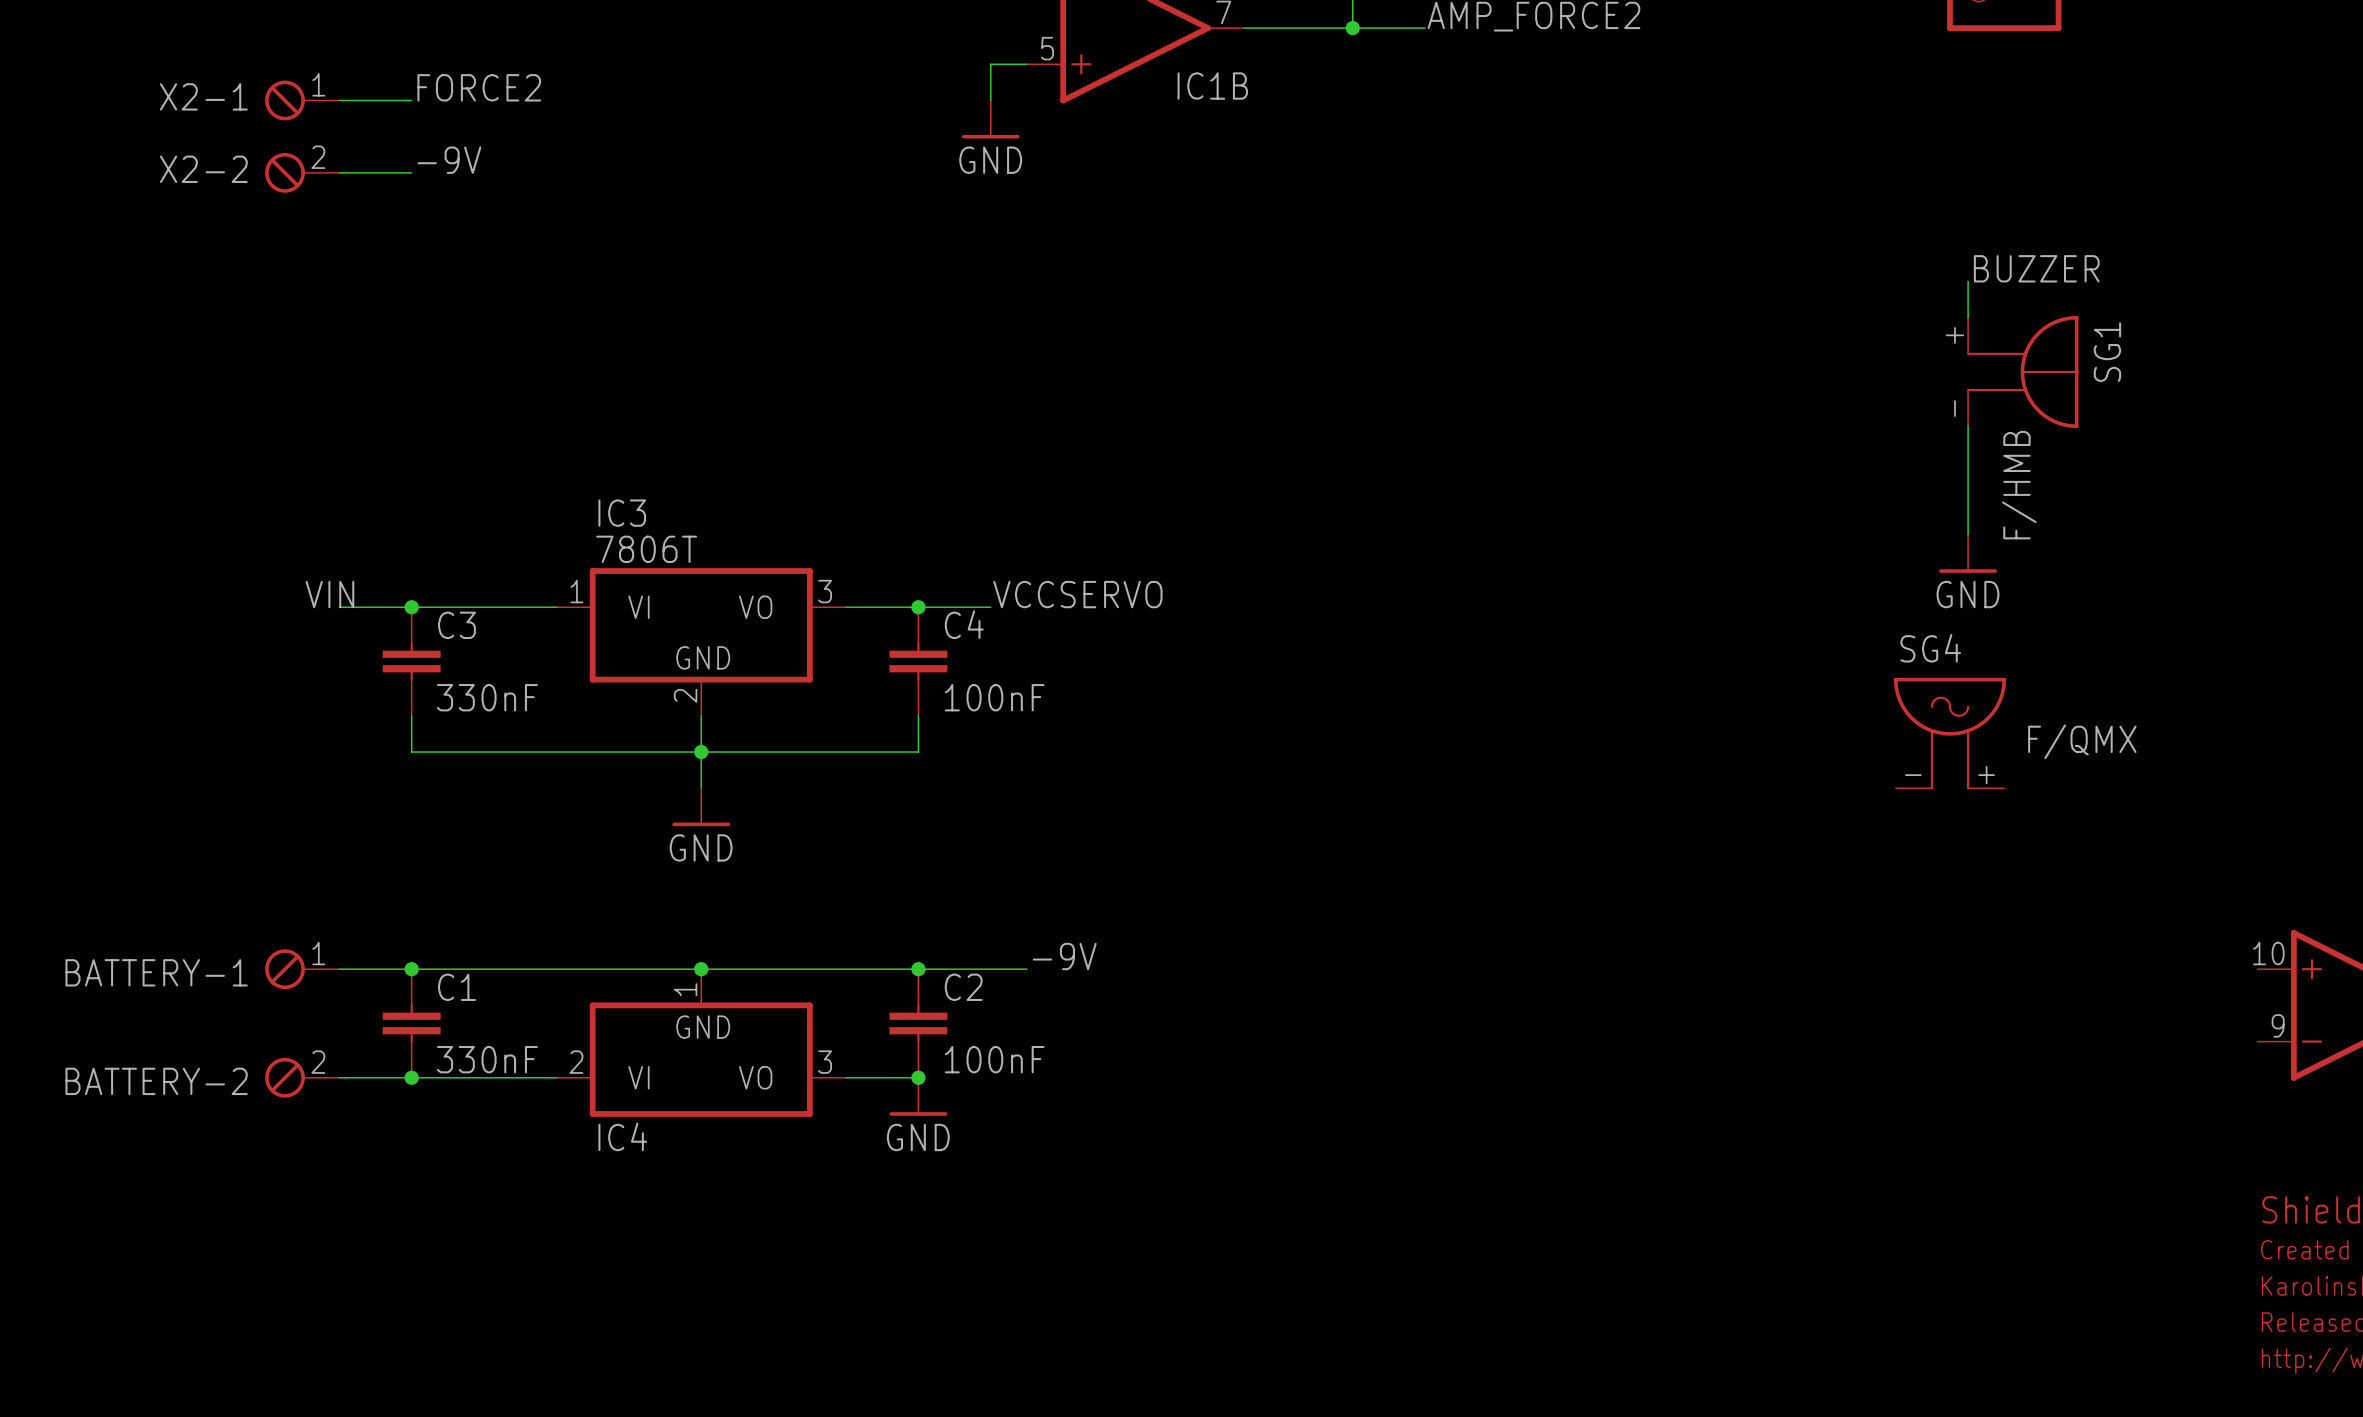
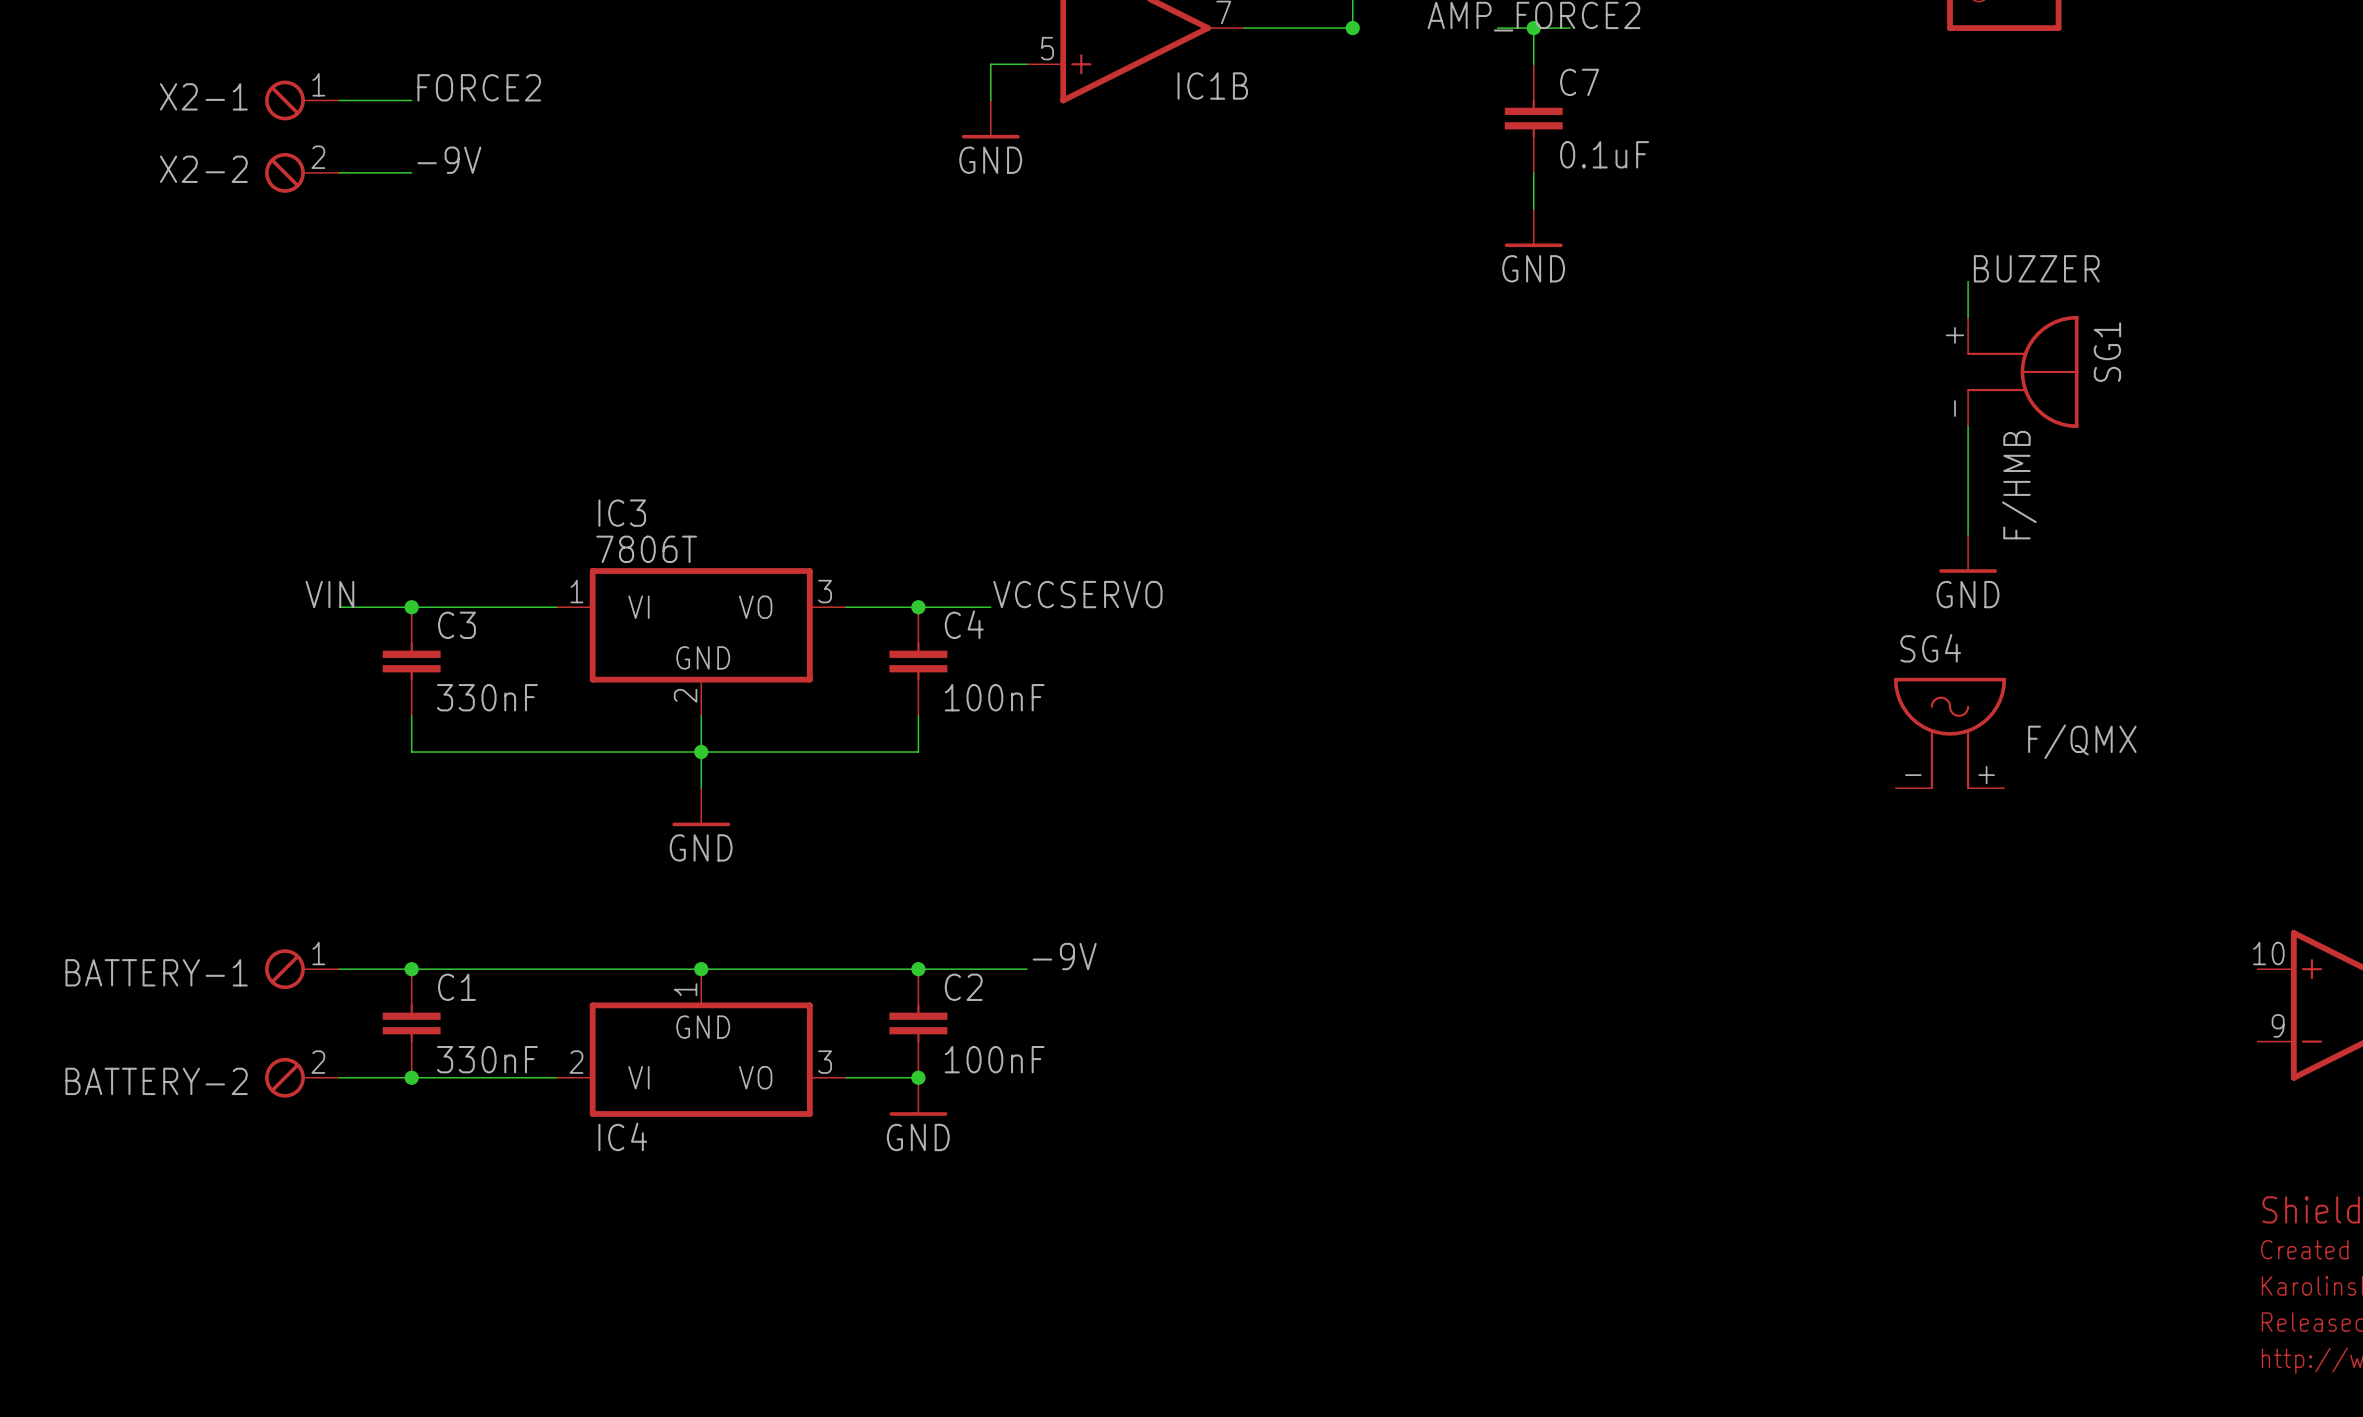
wire: (1352, 28) (1425, 28) -> (1497, 28) (1569, 28)
wire: none -> (1533, 28) (1533, 64)
junction: none -> (1533, 28)
C7: none -> 0.1uF (1533, 118)
wire: none -> (1533, 172) (1533, 209)
power symbol: none -> GND (1533, 228)

